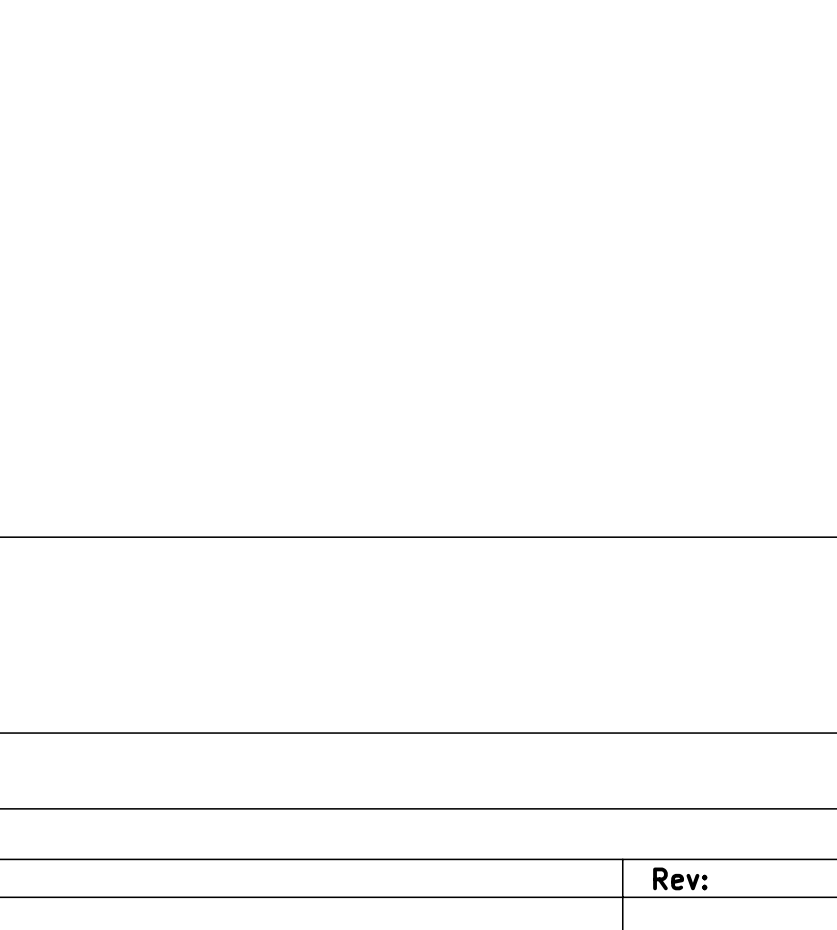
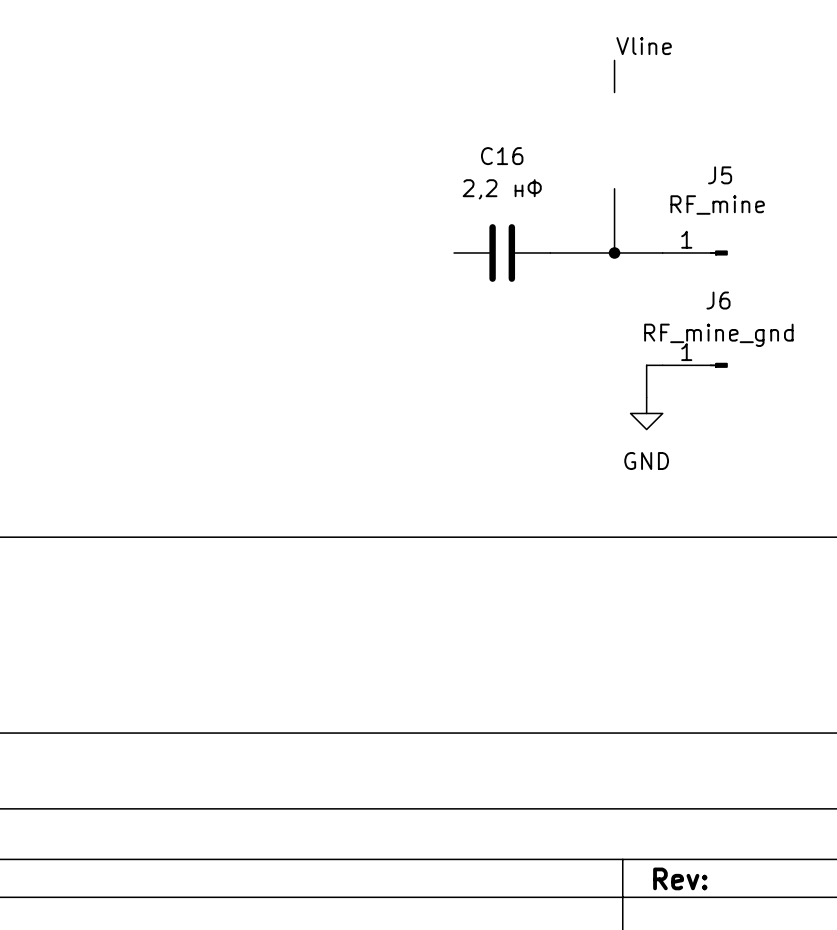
label: none -> Vline (644, 46)
wire: none -> (614, 60) (614, 92)
wire: none -> (614, 188) (614, 252)
C16: none -> 2,2 нФ (502, 252)
wire: none -> (550, 252) (662, 252)
junction: none -> (614, 252)
J5: none -> RF_mine (695, 252)
wire: none -> (662, 365) (646, 365) (646, 397)
J6: none -> RF_mine_gnd (695, 365)
power symbol: none -> GND (646, 413)

